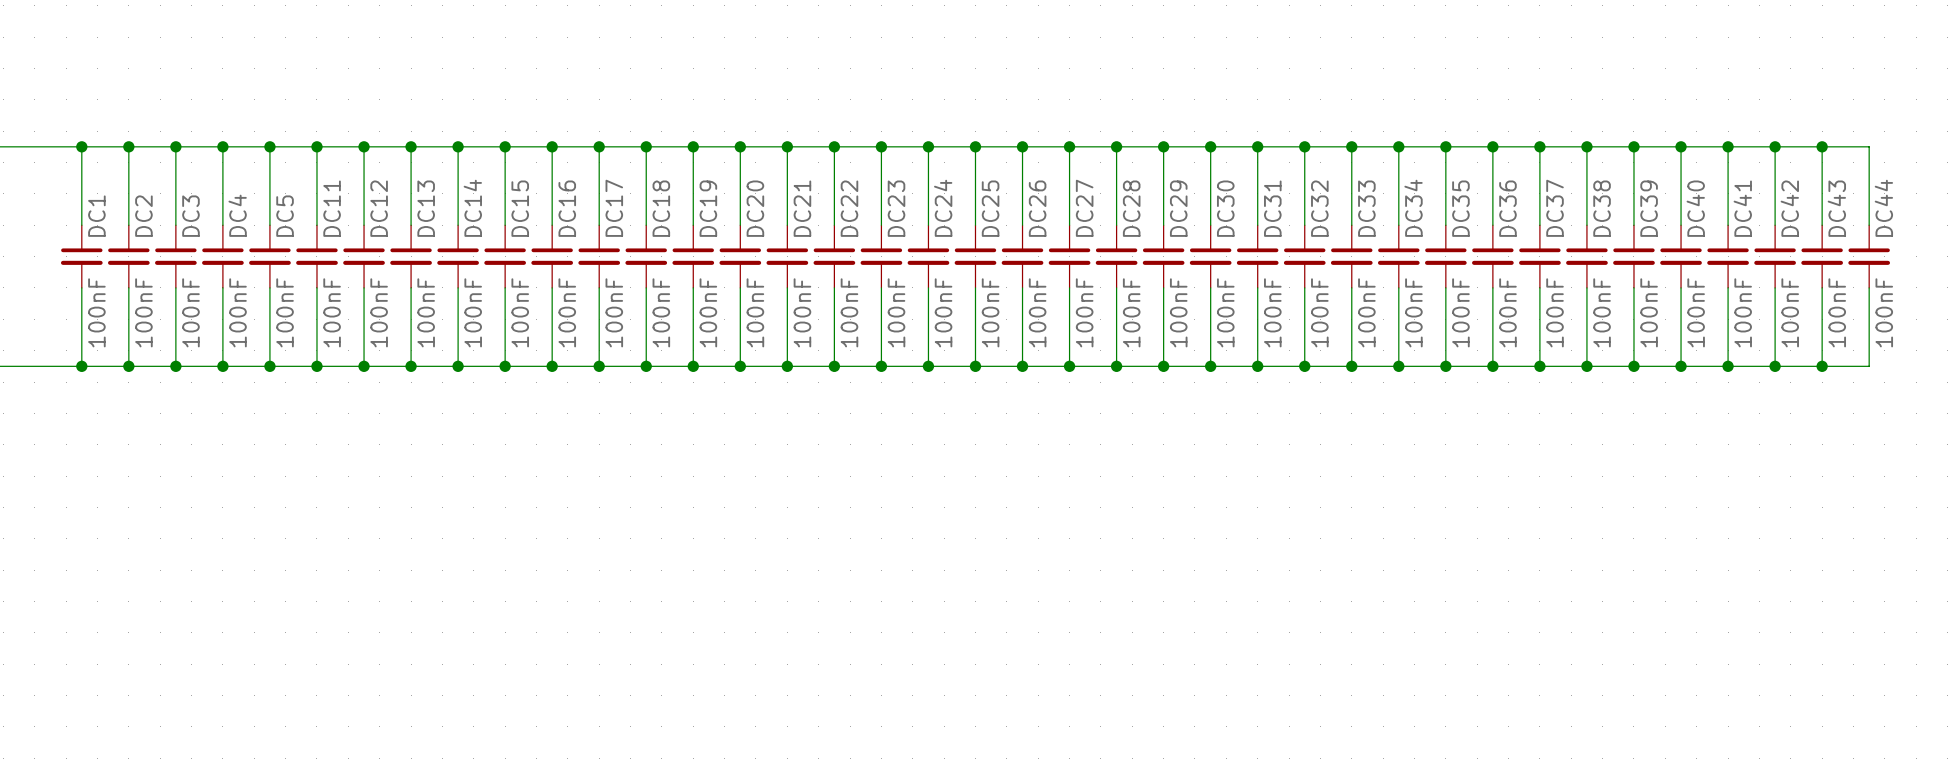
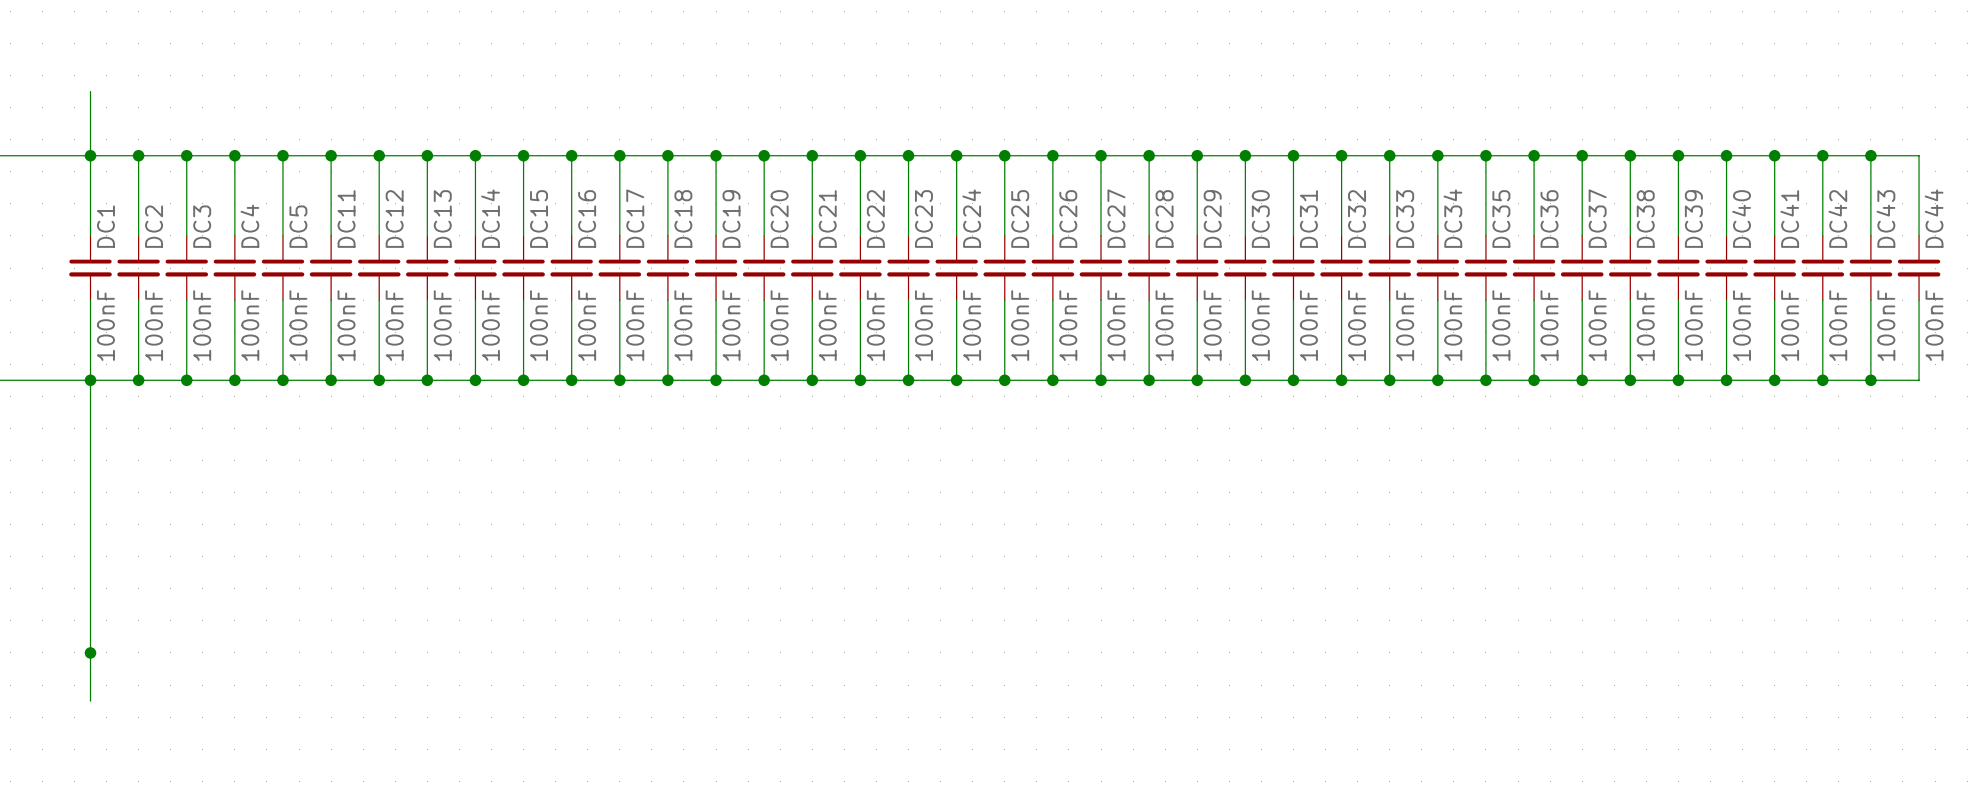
wire: none -> (90, 91) (90, 155)
wire: none -> (90, 380) (90, 701)
junction: none -> (90, 652)

